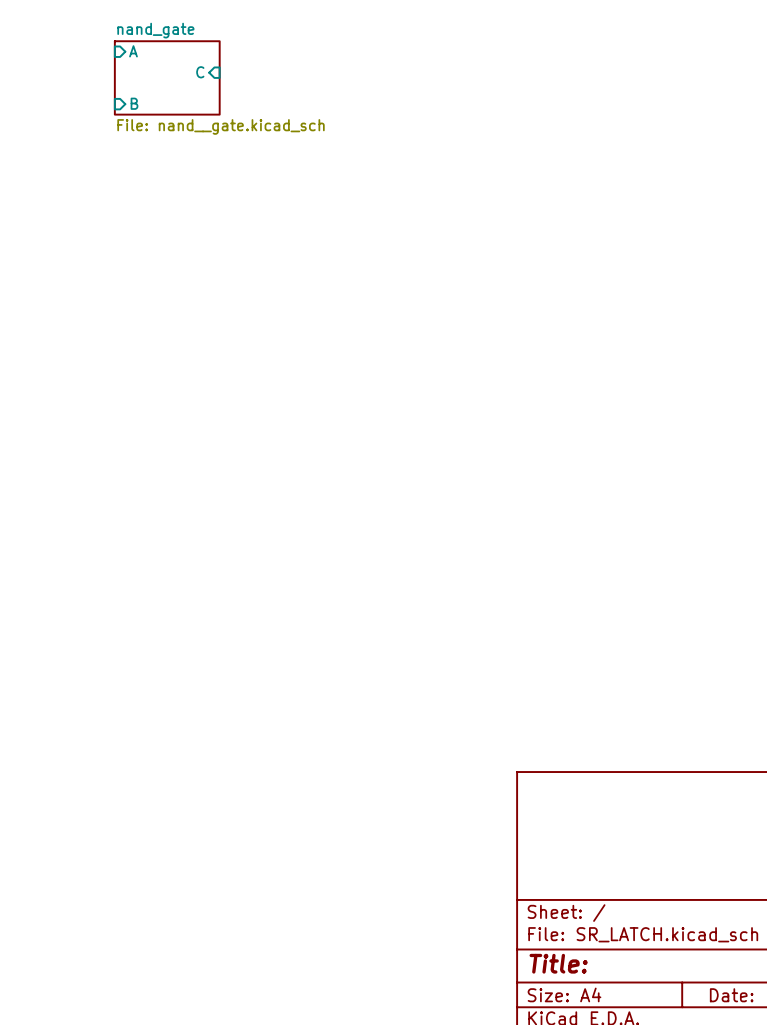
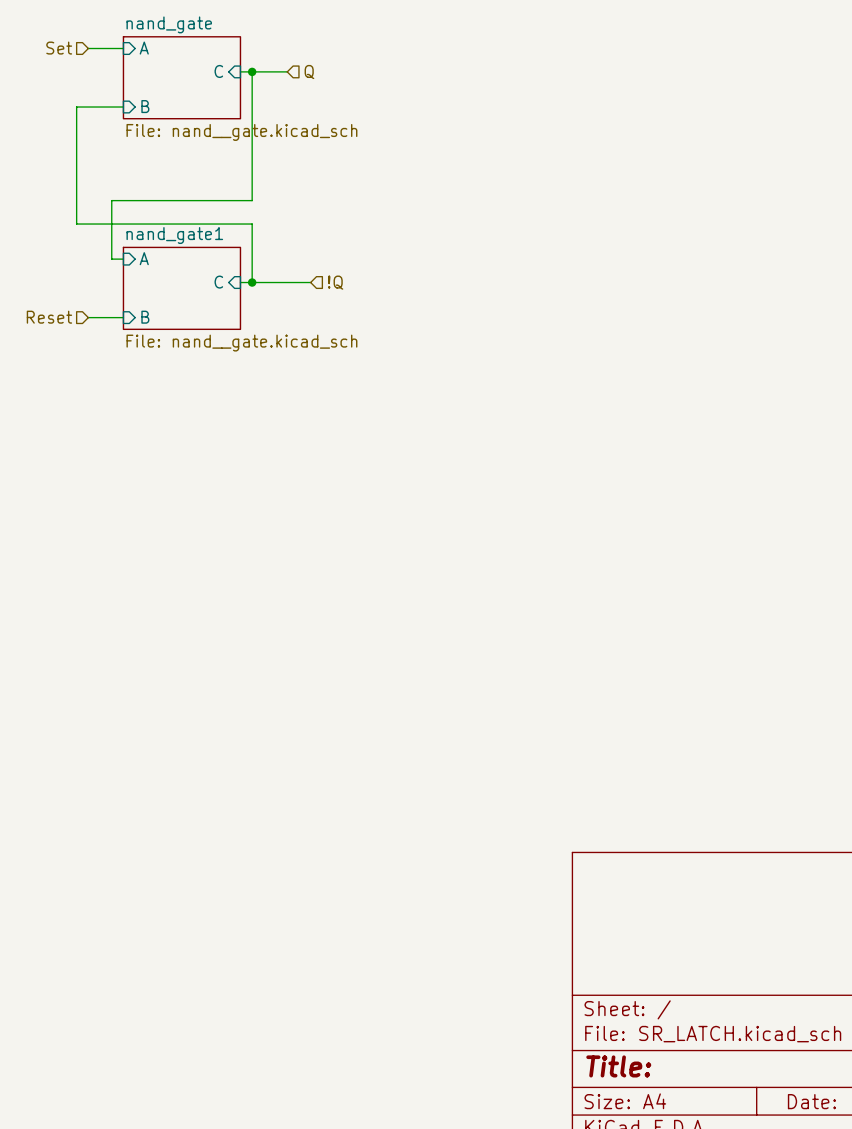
hierarchical label: none -> Set (59, 48)
wire: none -> (88, 48) (123, 48)
wire: none -> (240, 71) (287, 71)
wire: none -> (252, 71) (252, 200) (111, 200) (111, 259) (123, 259)
junction: none -> (252, 71)
hierarchical label: none -> Q (309, 72)
wire: none -> (123, 107) (76, 107) (76, 224) (252, 224) (252, 282)
sheet pin: none -> A (144, 258)
sheet pin: none -> C (218, 282)
wire: none -> (240, 282) (310, 282)
junction: none -> (252, 282)
hierarchical label: none -> !Q (335, 282)
sheet nand_gate1: none -> File: nand__gate.kicad_sch (181, 288)
hierarchical label: none -> Reset (49, 317)
wire: none -> (88, 317) (123, 317)
sheet pin: none -> B (145, 317)

